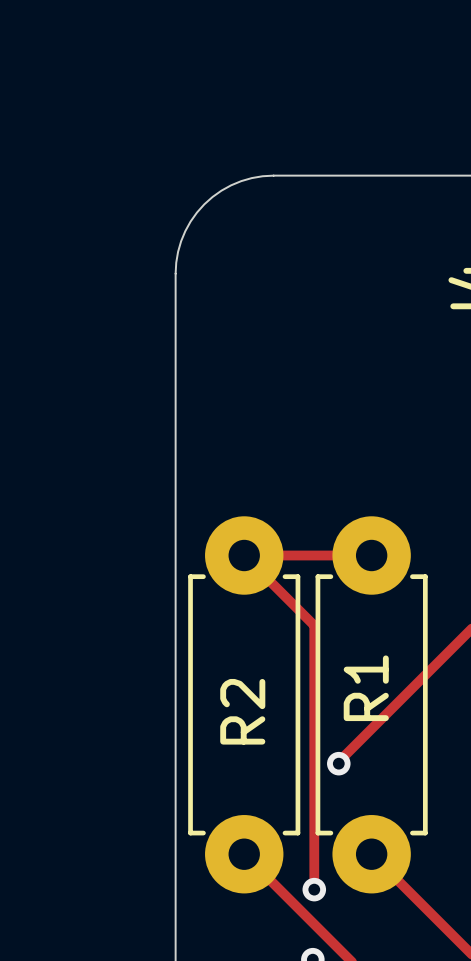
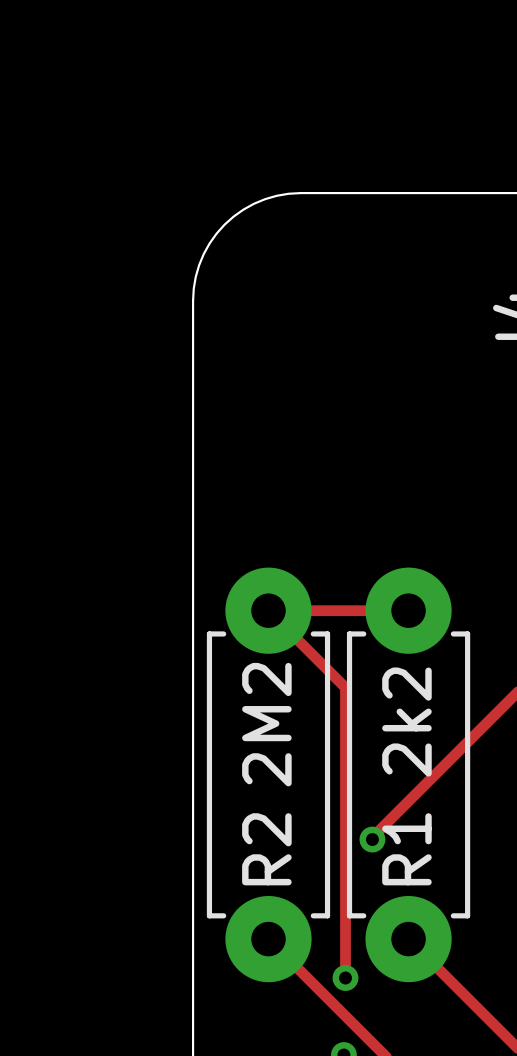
R1 value: none -> 2k2 (406, 722)
R2 value: none -> 2M2 (266, 724)
R1 name position: R1 (366, 688) -> R1 (406, 849)
R2 name position: R2 (242, 711) -> R2 (266, 849)

